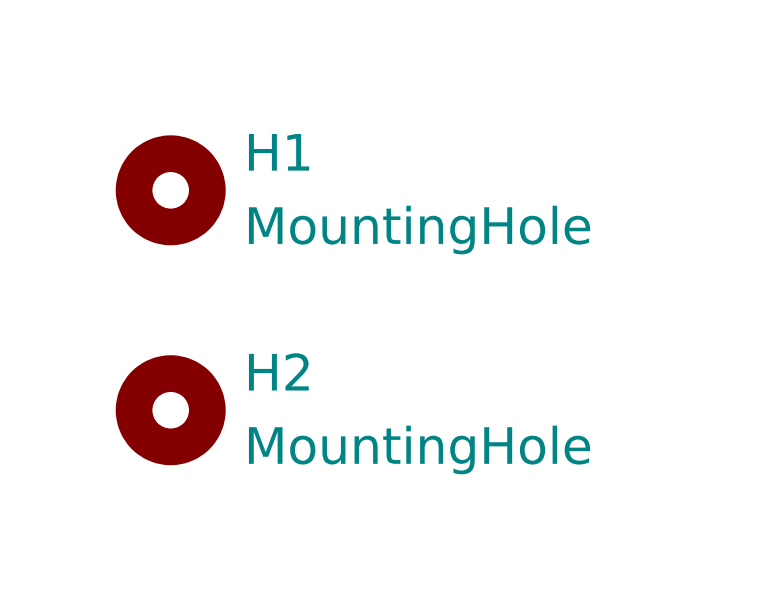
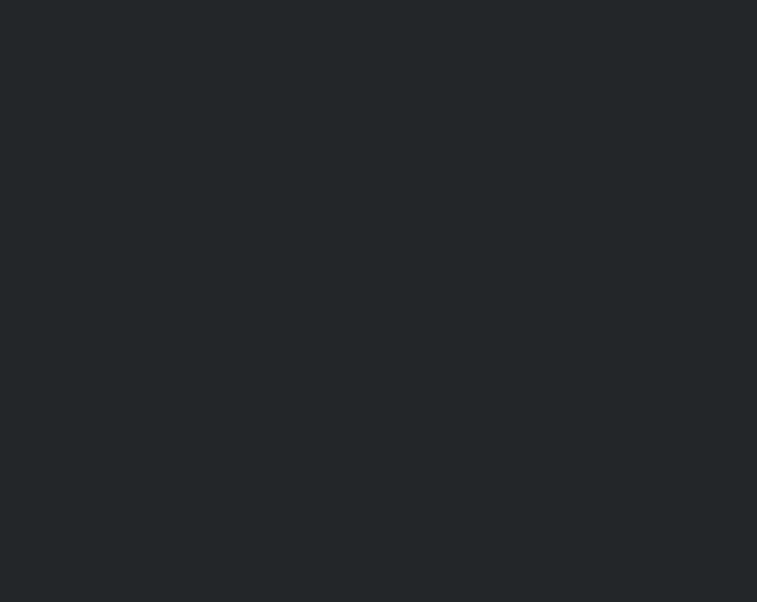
H1: MountingHole (170, 190) -> none
H2: MountingHole (170, 410) -> none

